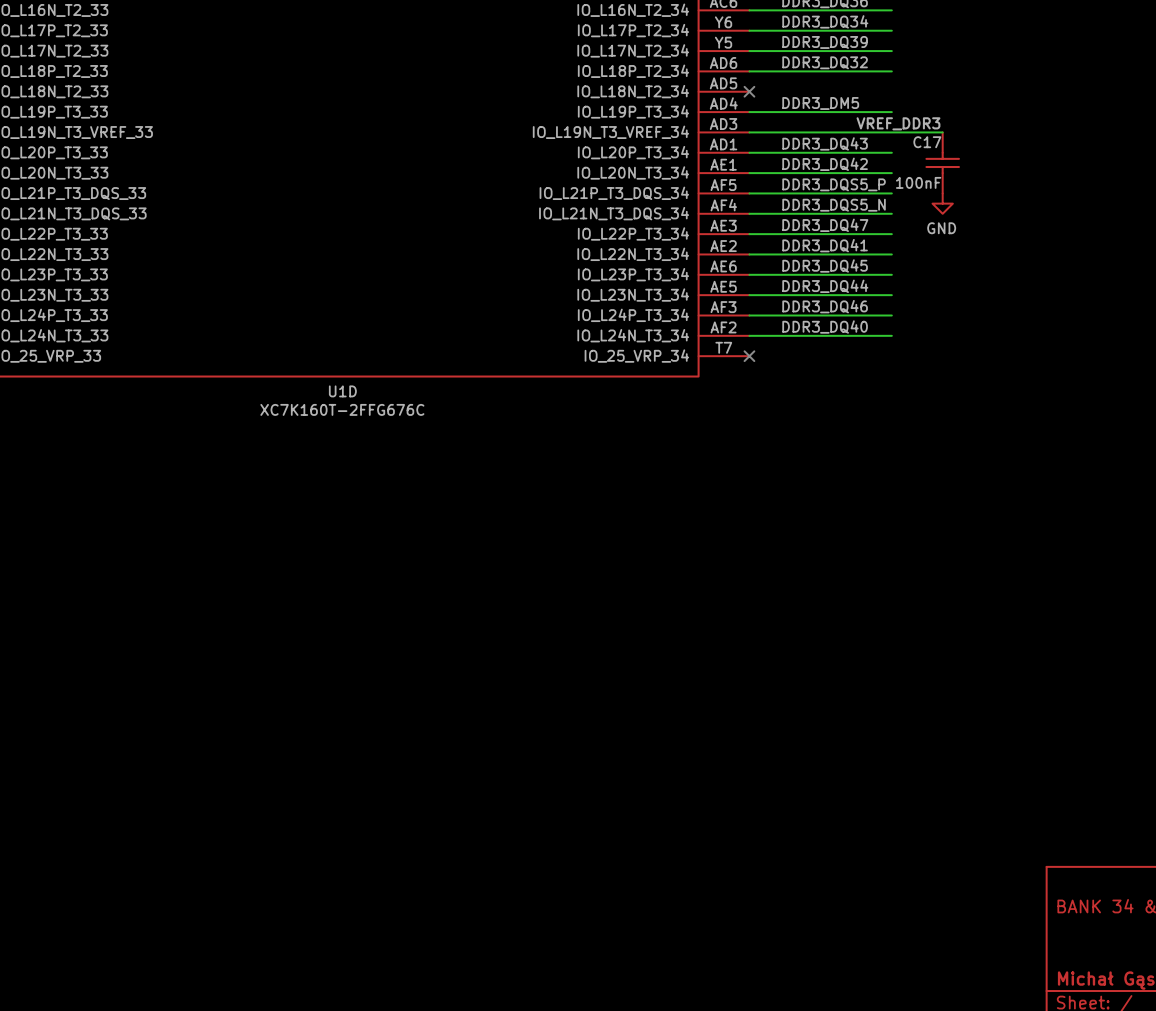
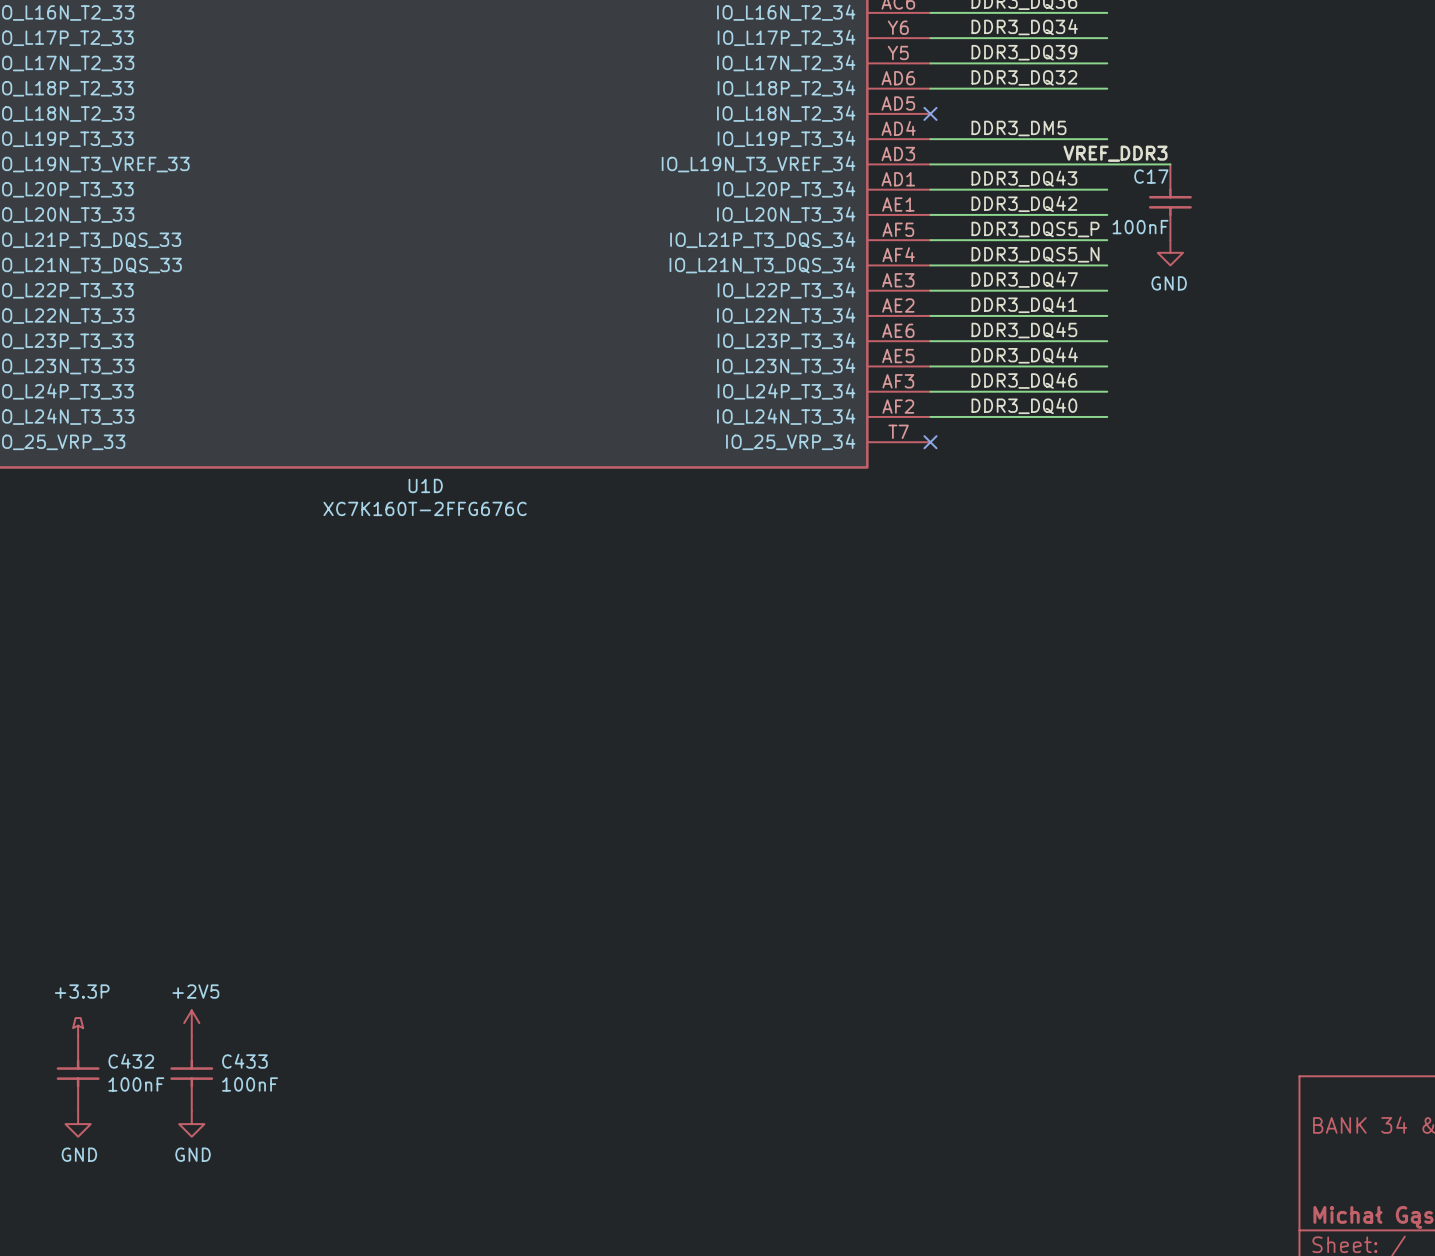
power symbol: none -> +2V5 (191, 1023)
power symbol: none -> +3.3P (78, 1026)
C432: none -> (78, 1073)
C433: none -> (191, 1073)
power symbol: none -> GND (78, 1124)
power symbol: none -> GND (191, 1124)

